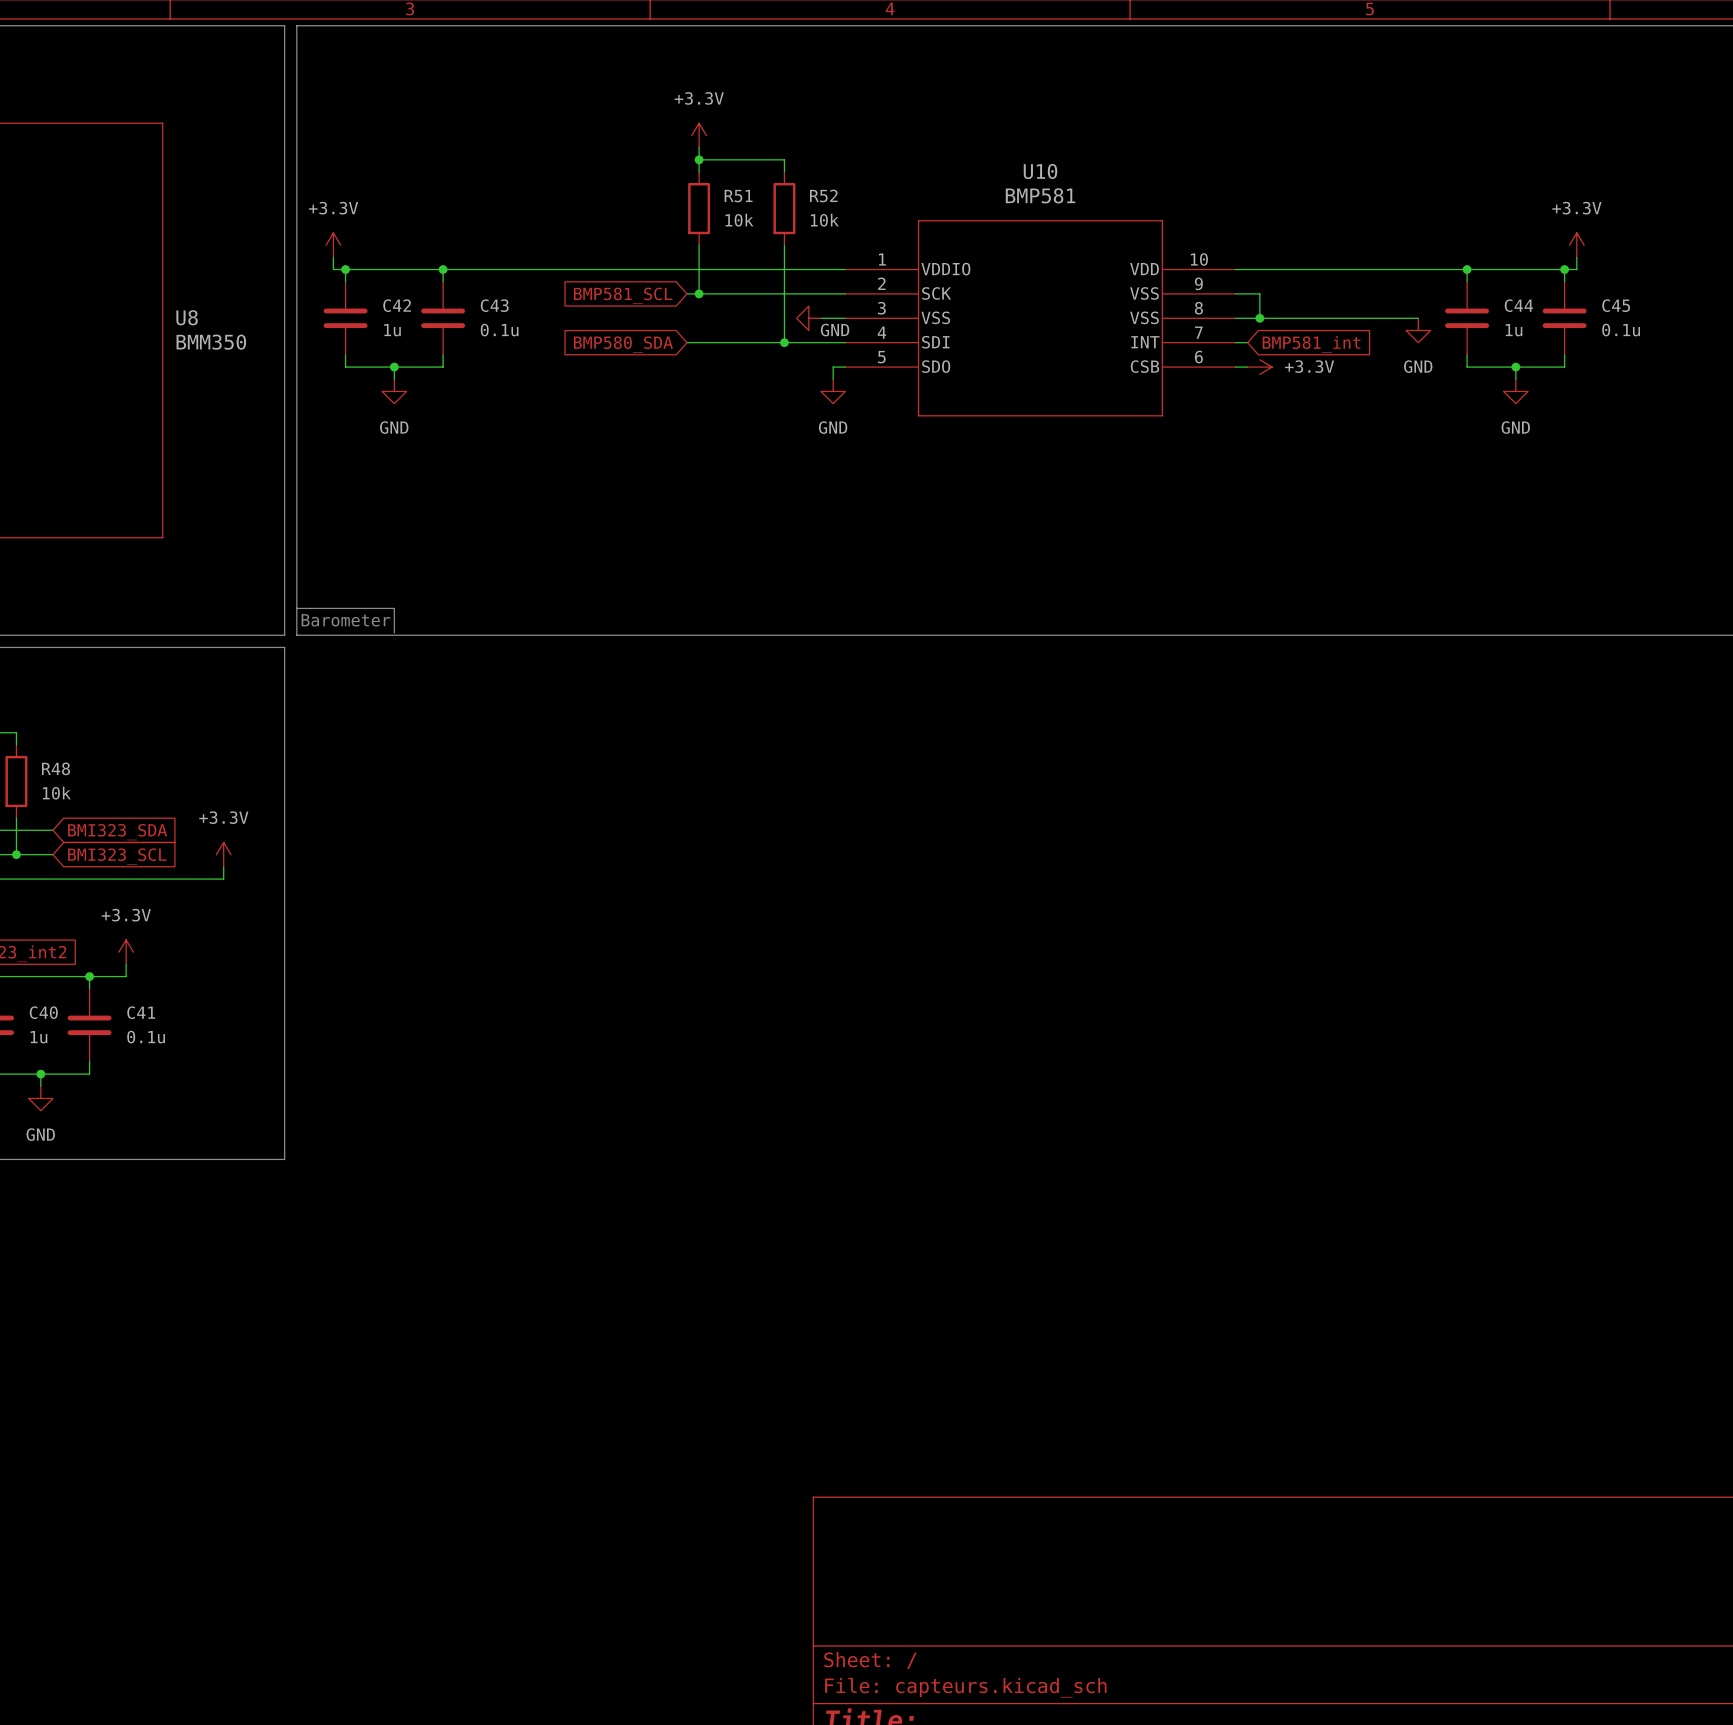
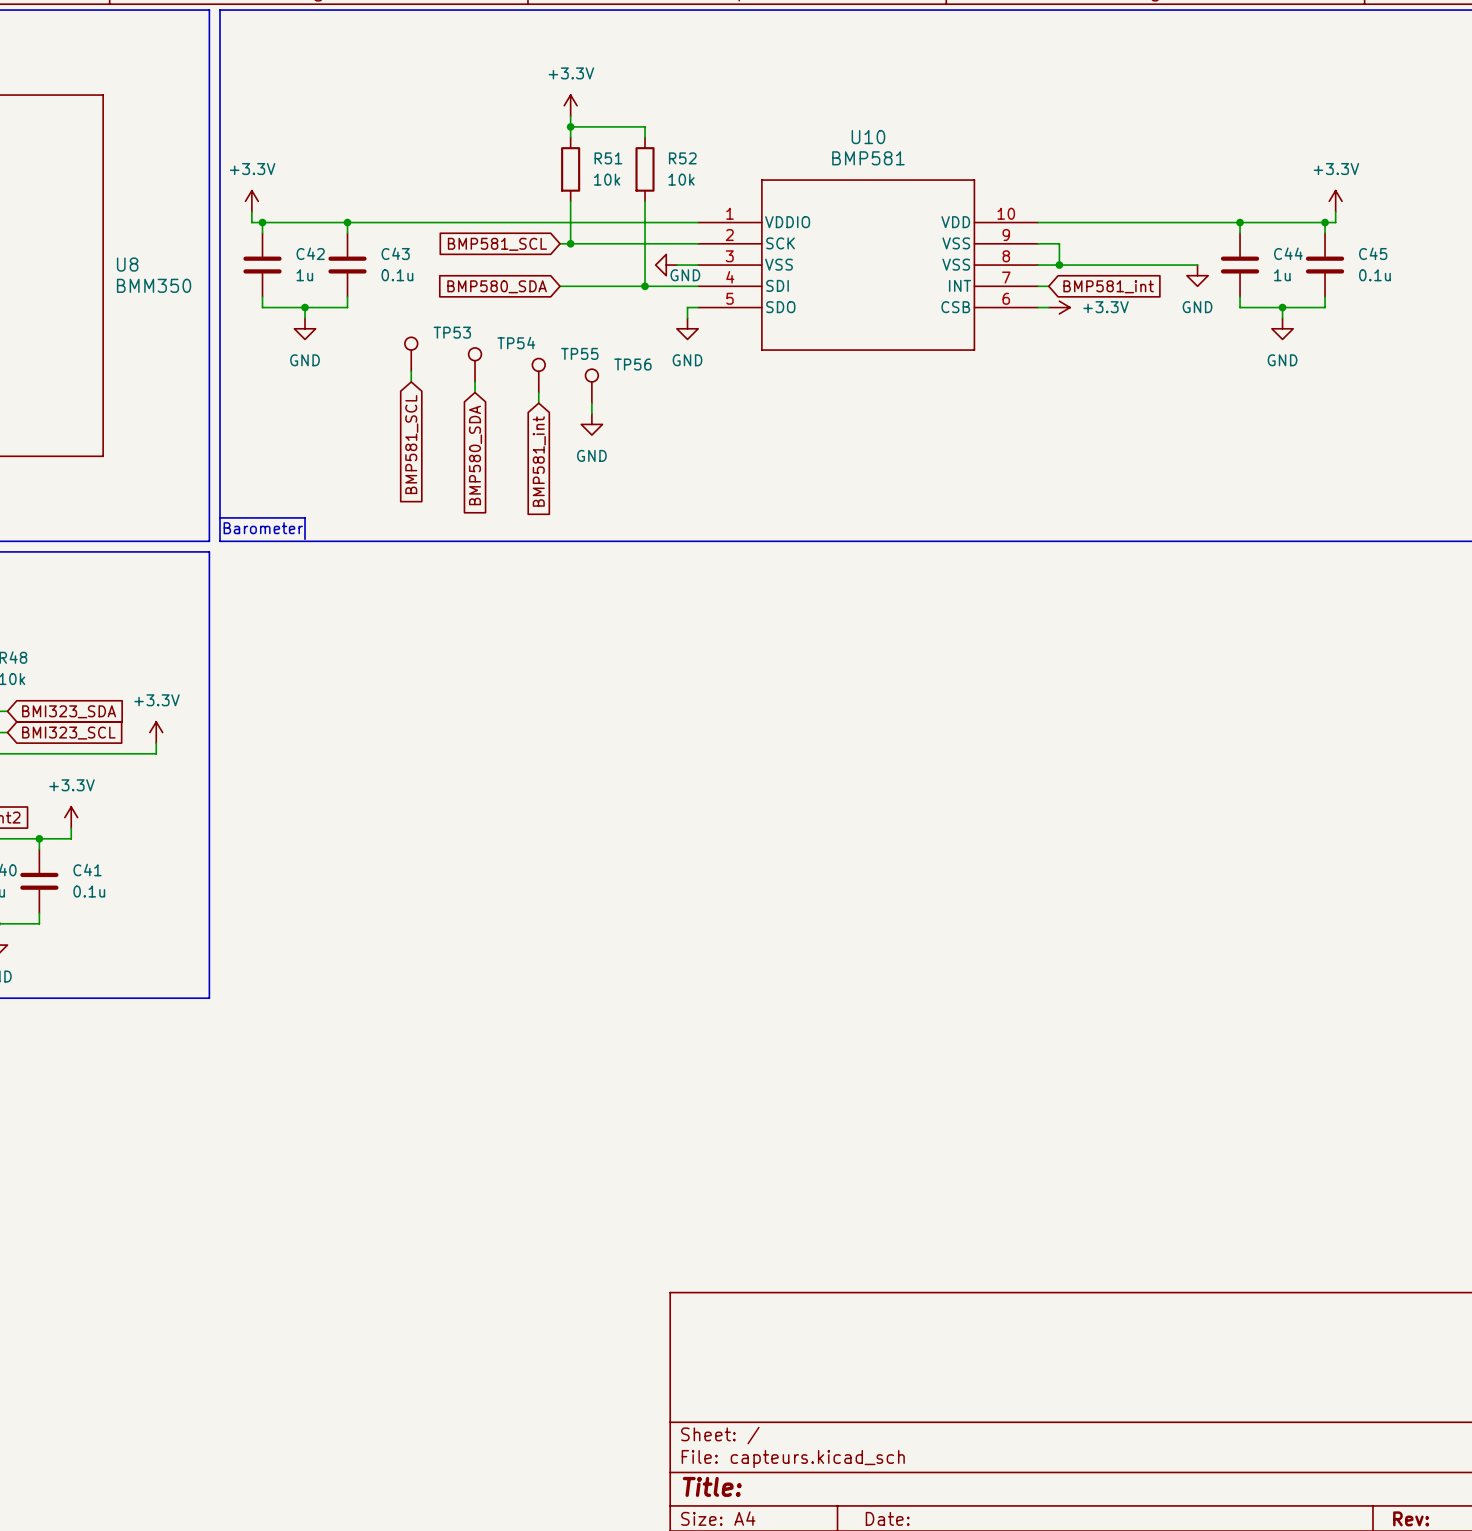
TP53: none -> (411, 354)
TP54: none -> (475, 364)
wire: none -> (411, 371) (411, 381)
TP55: none -> (538, 375)
wire: none -> (475, 381) (475, 392)
TP56: none -> (591, 386)
wire: none -> (538, 392) (538, 403)
wire: none -> (591, 403) (591, 413)
power symbol: none -> GND (591, 424)
global label: none -> BMP581_SCL (411, 444)
global label: none -> BMP580_SDA (475, 455)
global label: none -> BMP581_int (539, 461)

